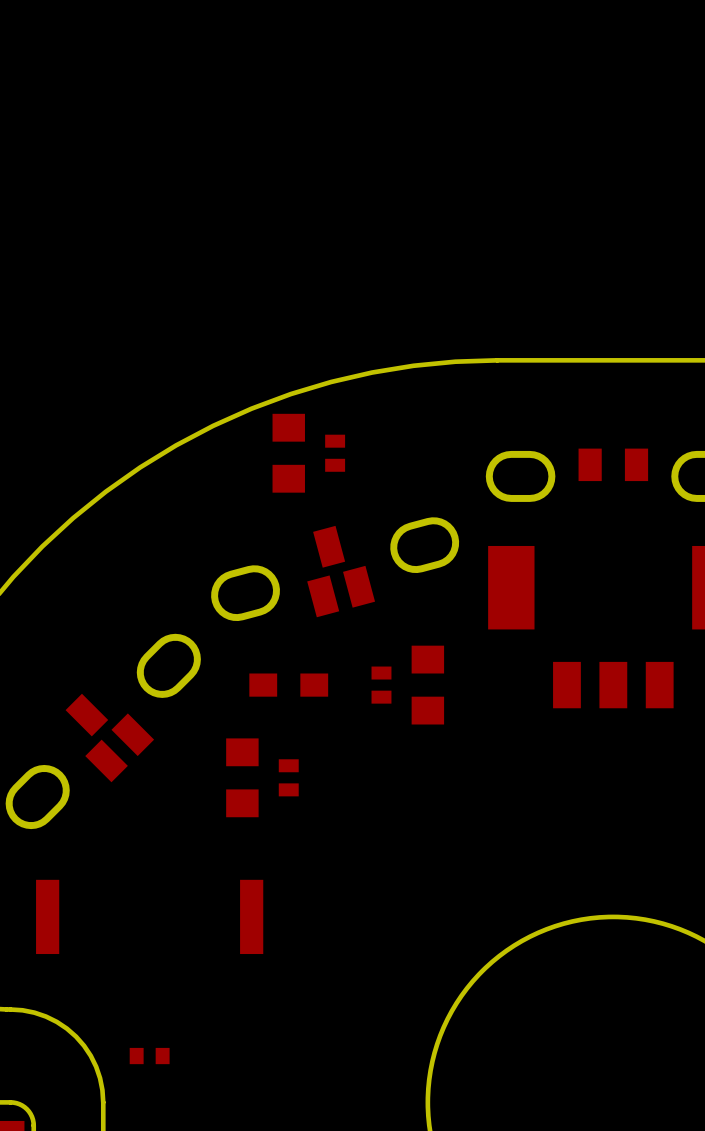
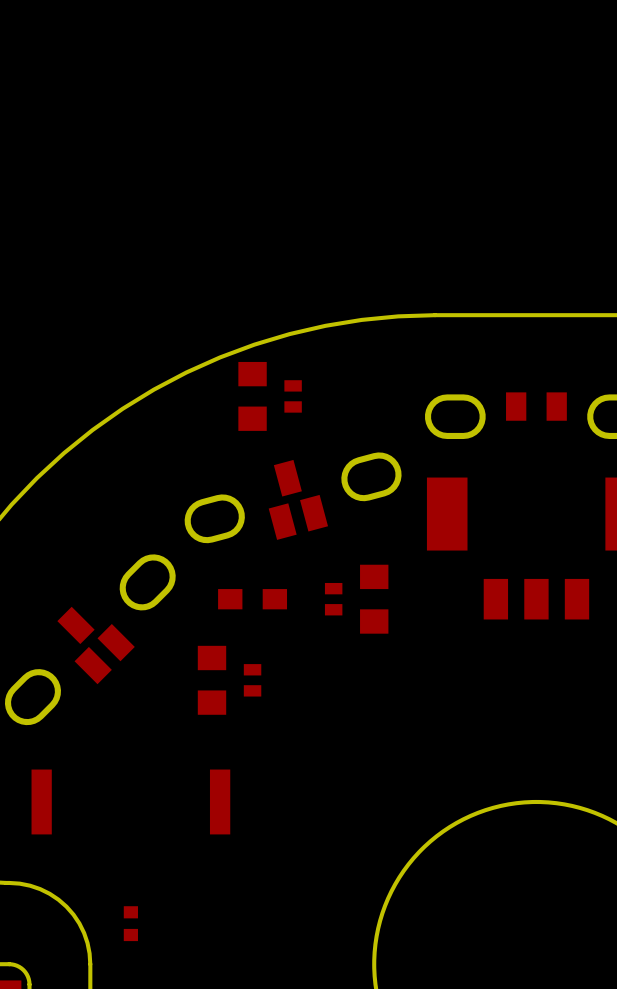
part rotation: 0° (149, 1056) -> 90° clockwise (130, 923)

